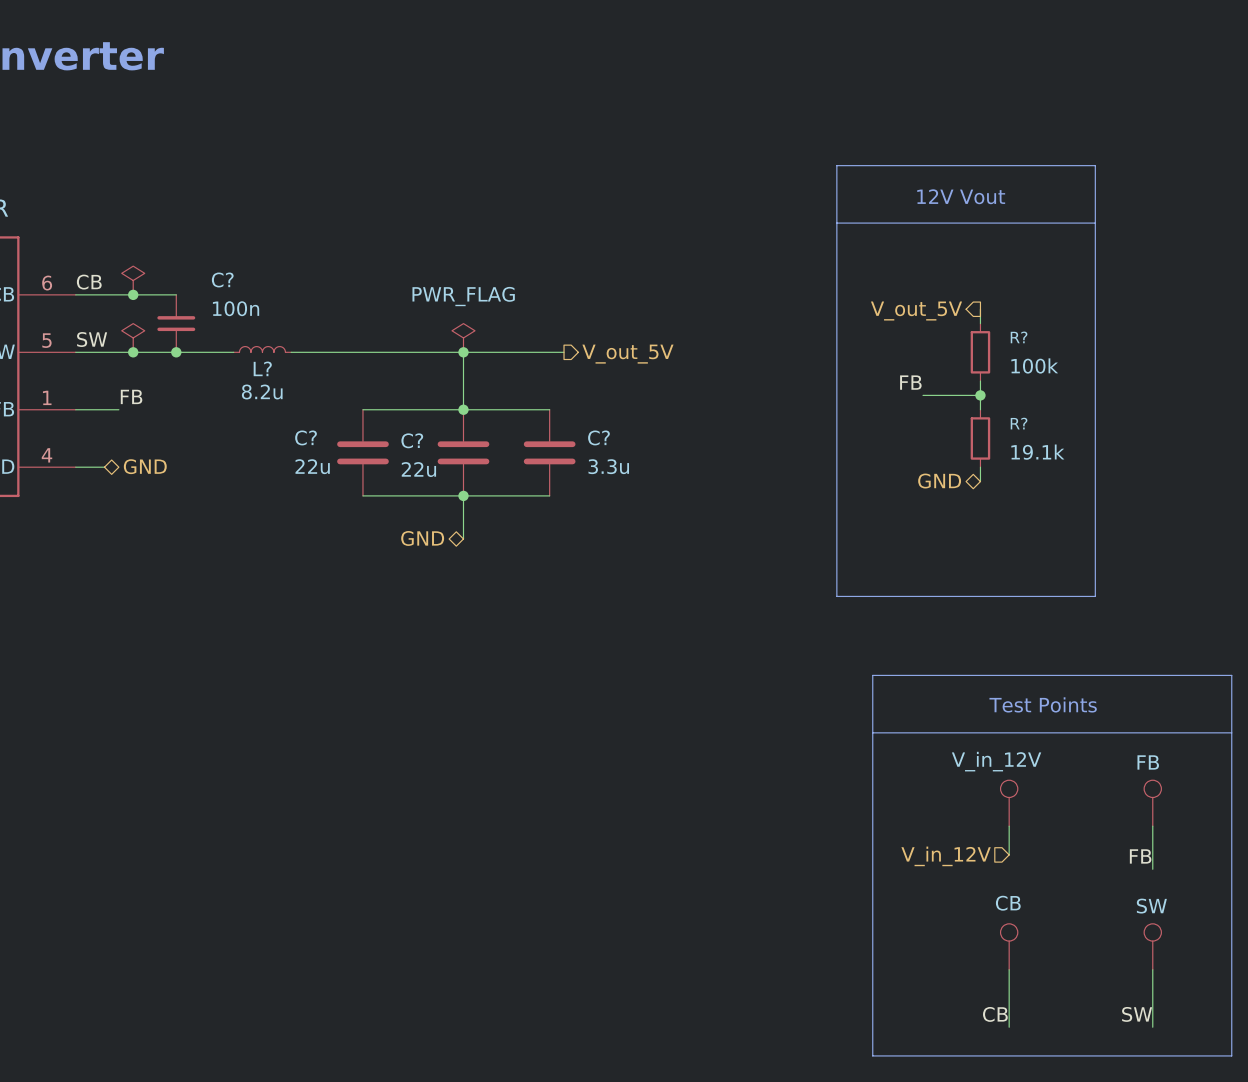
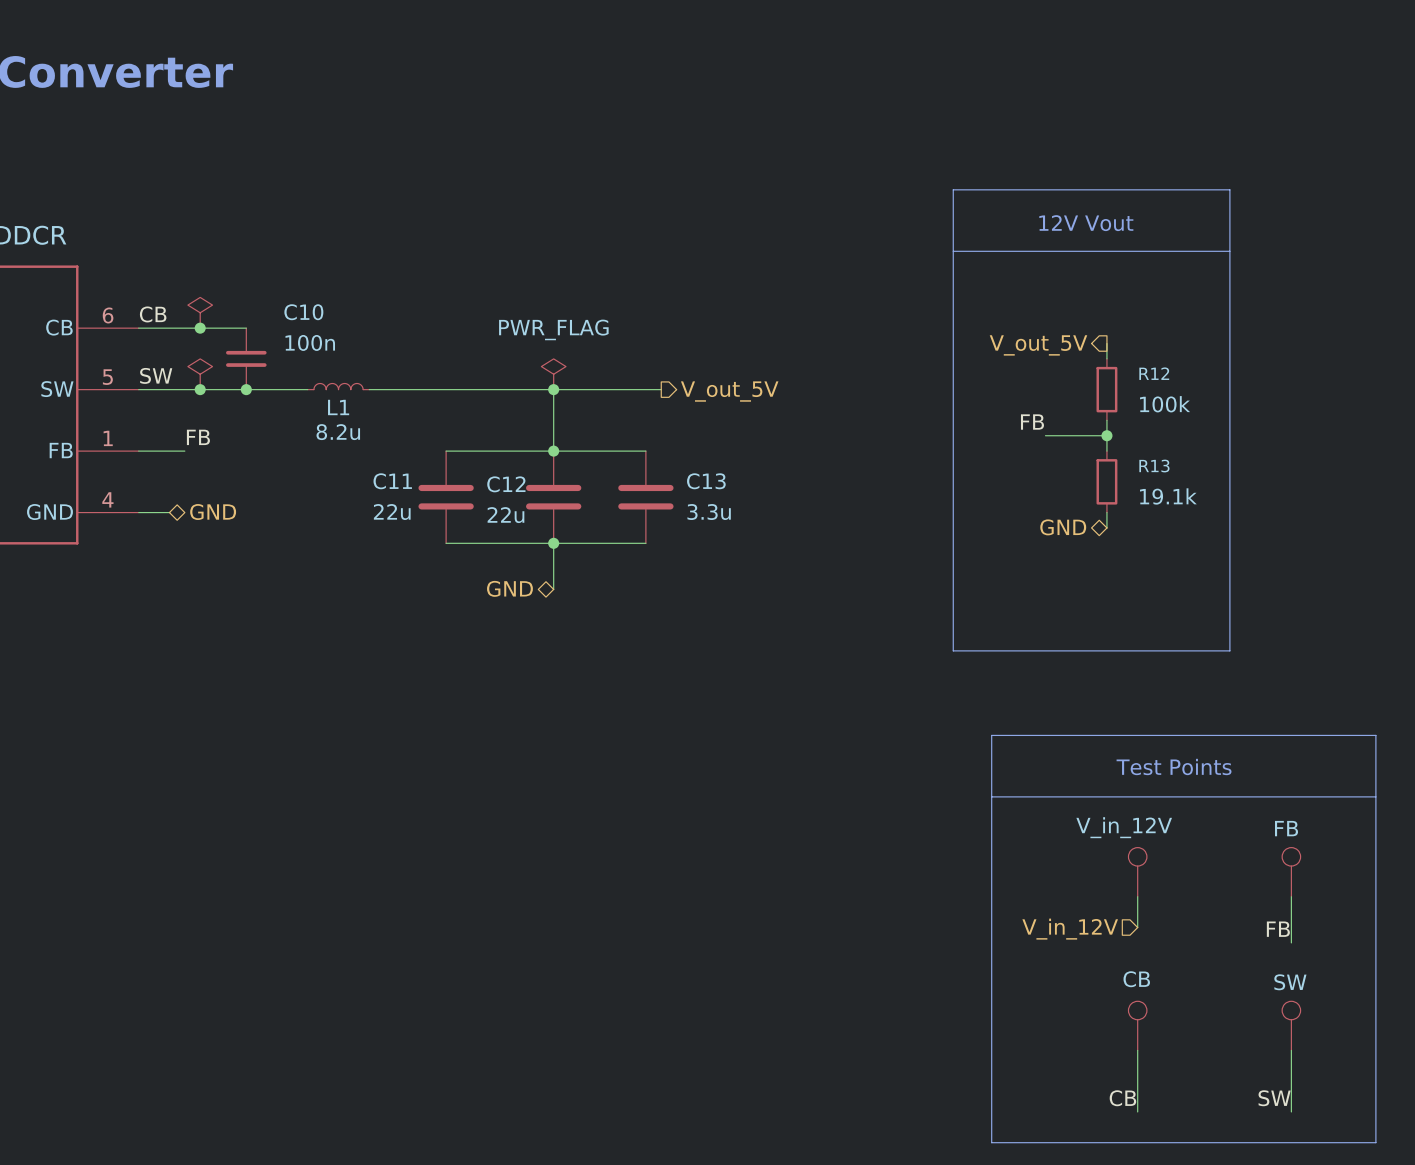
C? name: C? (222, 279) -> C10 (303, 312)
R? name: R? (1019, 337) -> R12 (1154, 373)
L? name: L? (262, 368) -> L1 (338, 407)
R? name: R? (1019, 423) -> R13 (1154, 466)
C? name: C? (306, 437) -> C11 (392, 481)
C? name: C? (598, 437) -> C13 (706, 481)
C? name: C? (412, 440) -> C12 (506, 484)

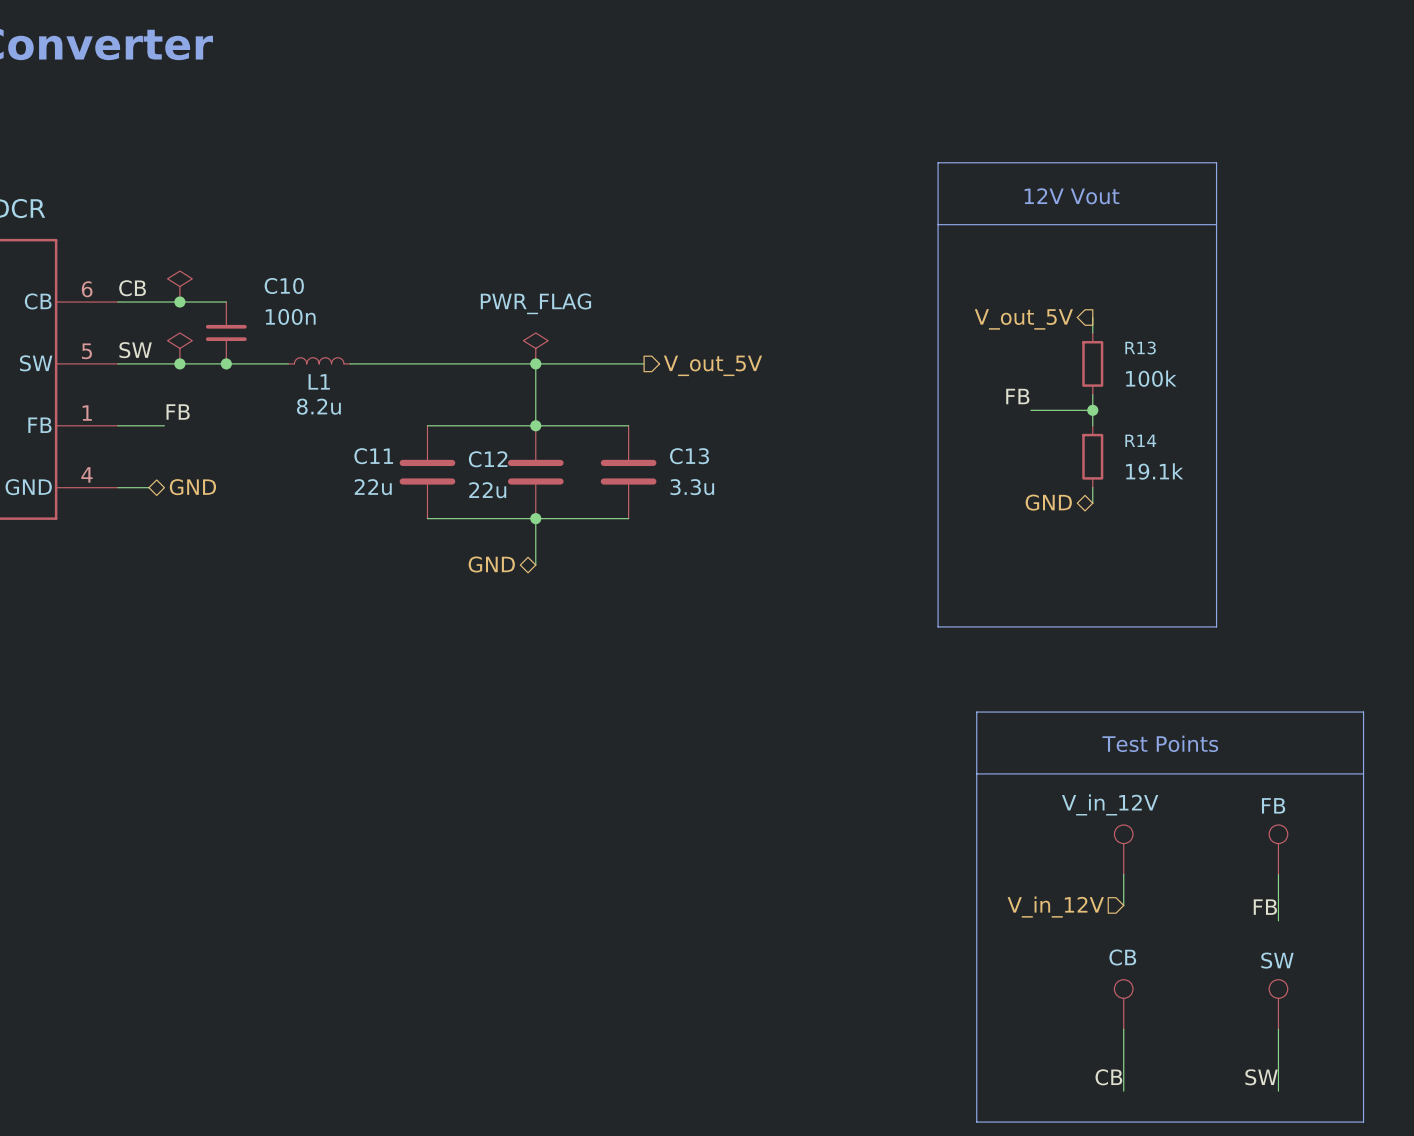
R12 name: R12 (1154, 373) -> R13 (1140, 347)
R13 name: R13 (1154, 466) -> R14 (1140, 440)

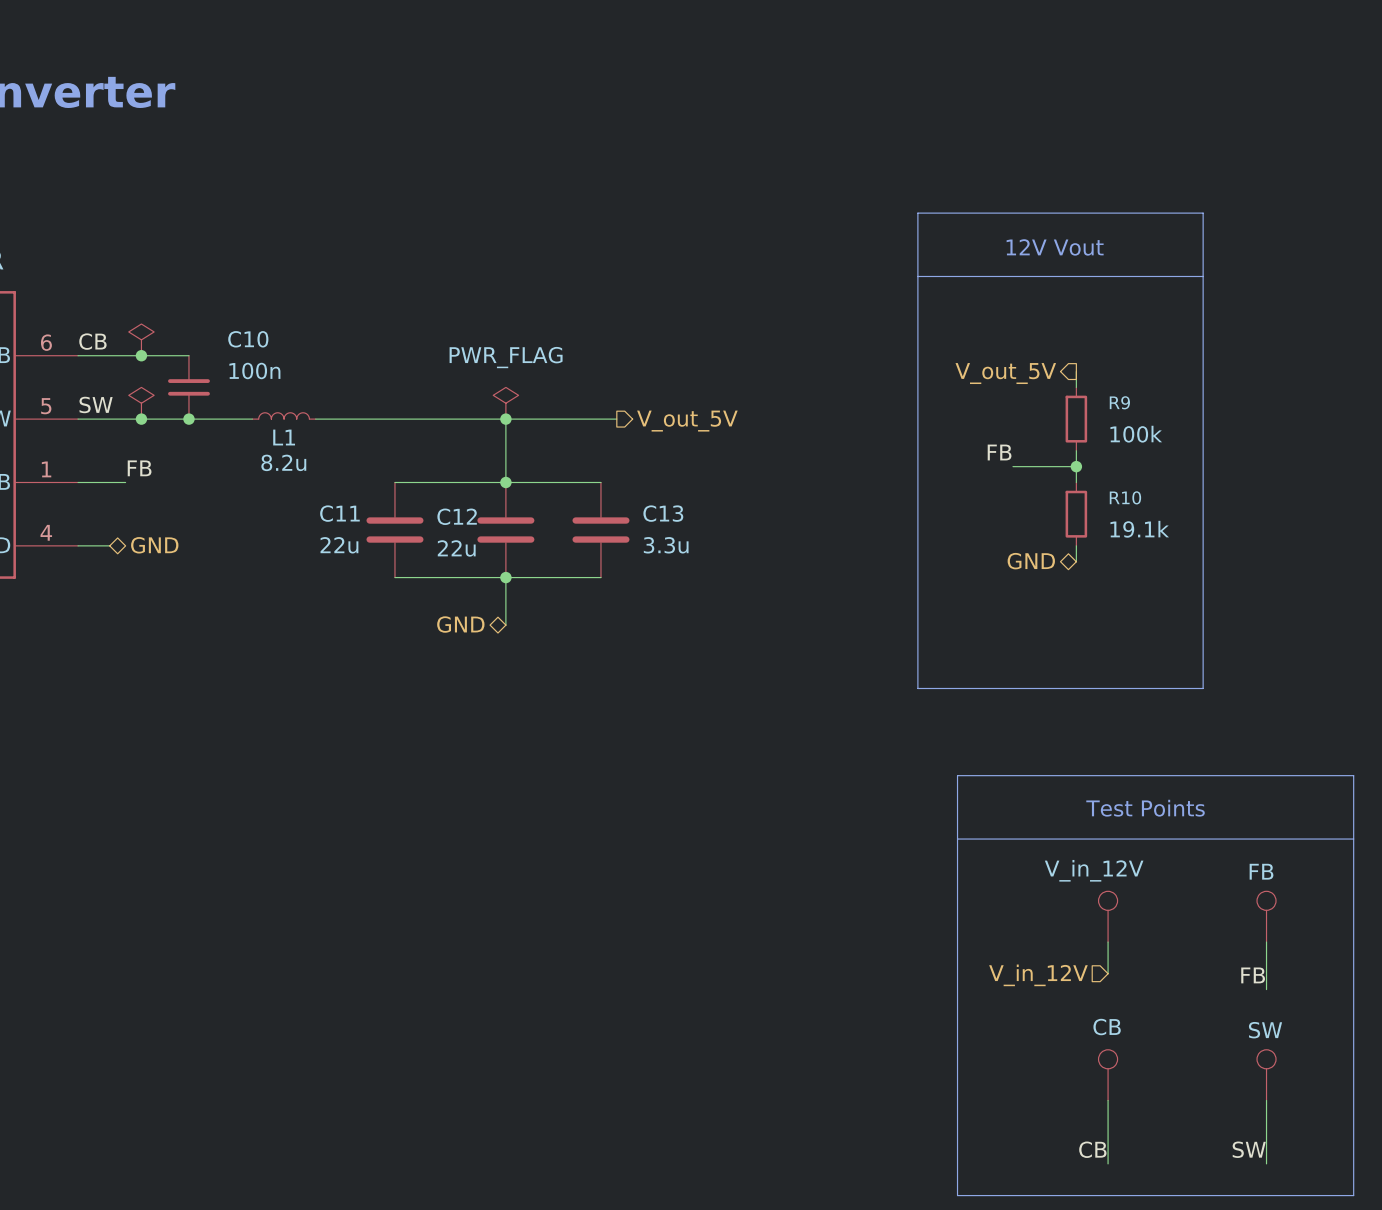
R13 name: R13 (1140, 347) -> R9 (1119, 402)
R14 name: R14 (1140, 440) -> R10 (1125, 497)

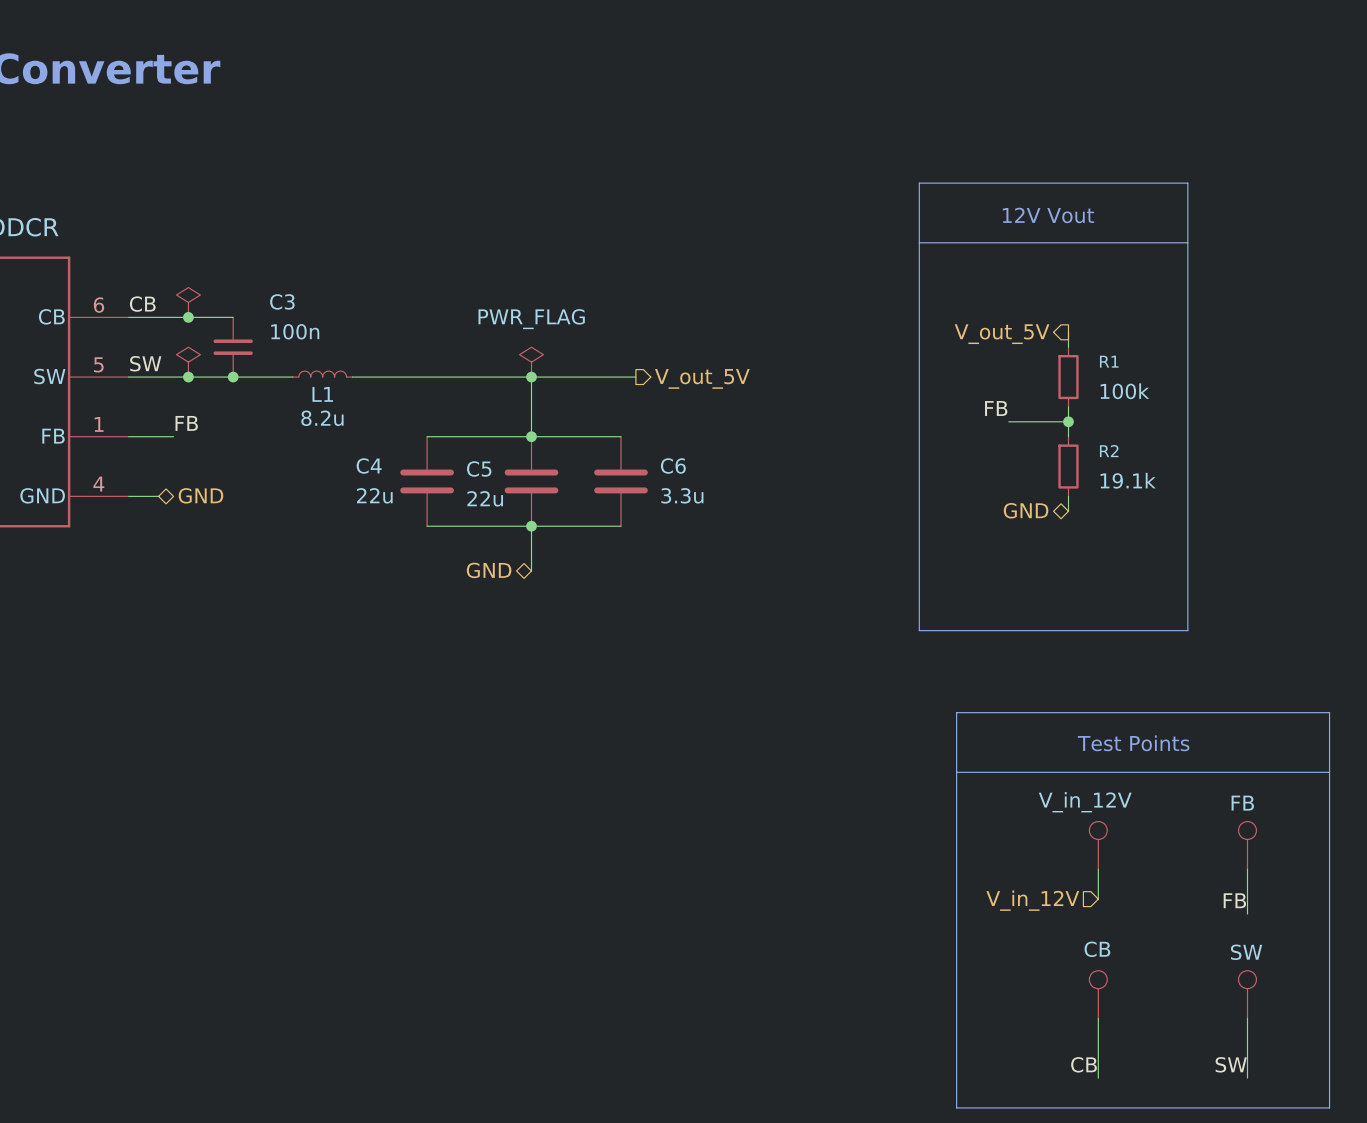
C10 name: C10 (248, 339) -> C3 (282, 301)
R9 name: R9 (1119, 402) -> R1 (1109, 361)
R10 name: R10 (1125, 497) -> R2 (1109, 451)
C11 name: C11 (339, 513) -> C4 (369, 466)
C13 name: C13 (663, 513) -> C6 (673, 466)
C12 name: C12 (457, 516) -> C5 (479, 468)

